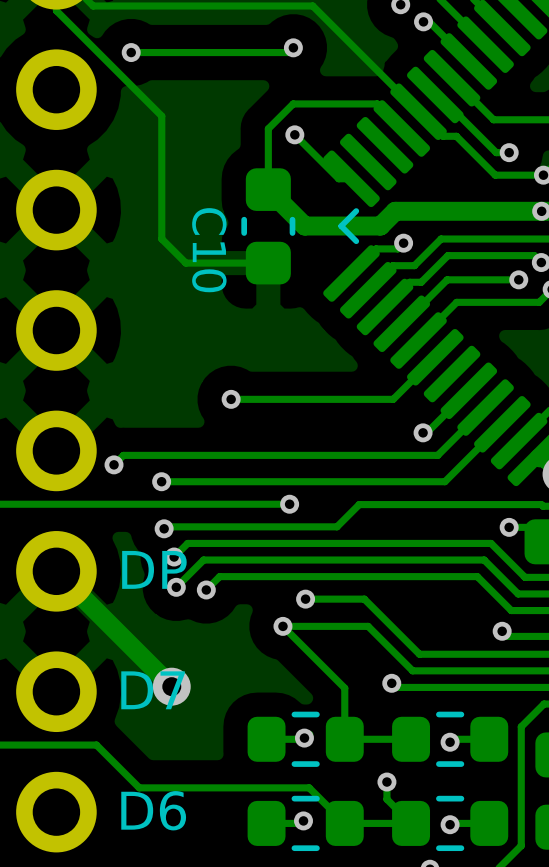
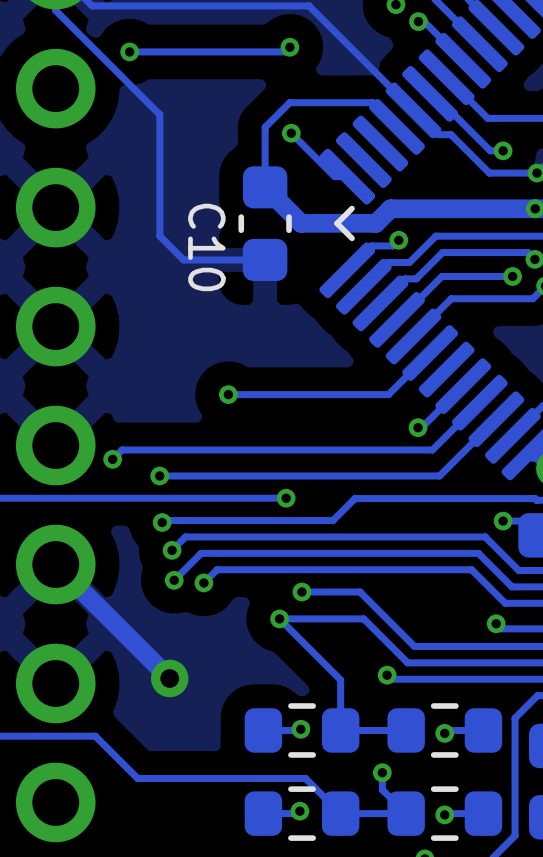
text: DP (154, 569) -> none
text: D7 (153, 690) -> none
text: D6 (153, 810) -> none

